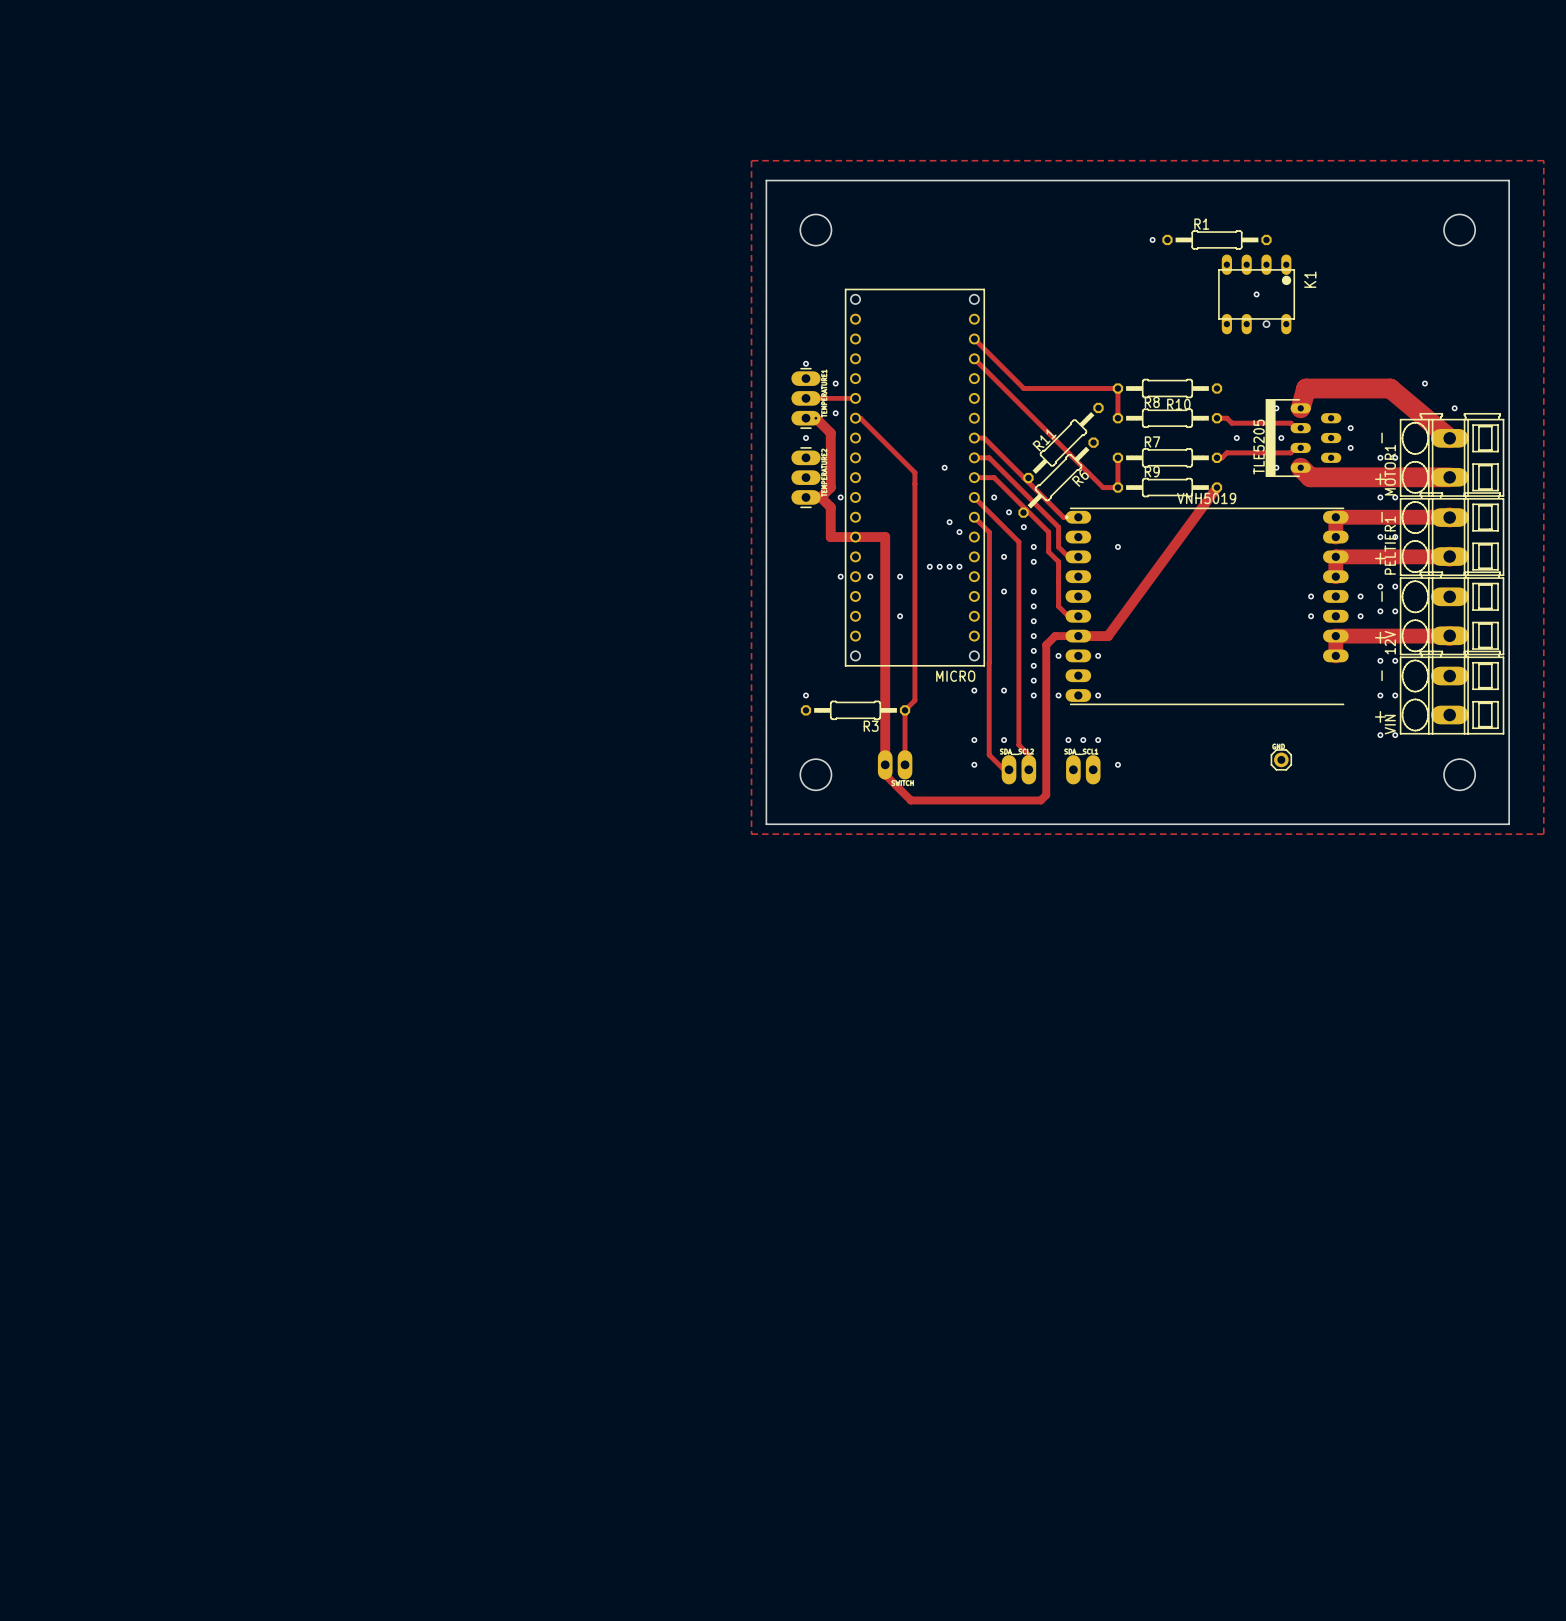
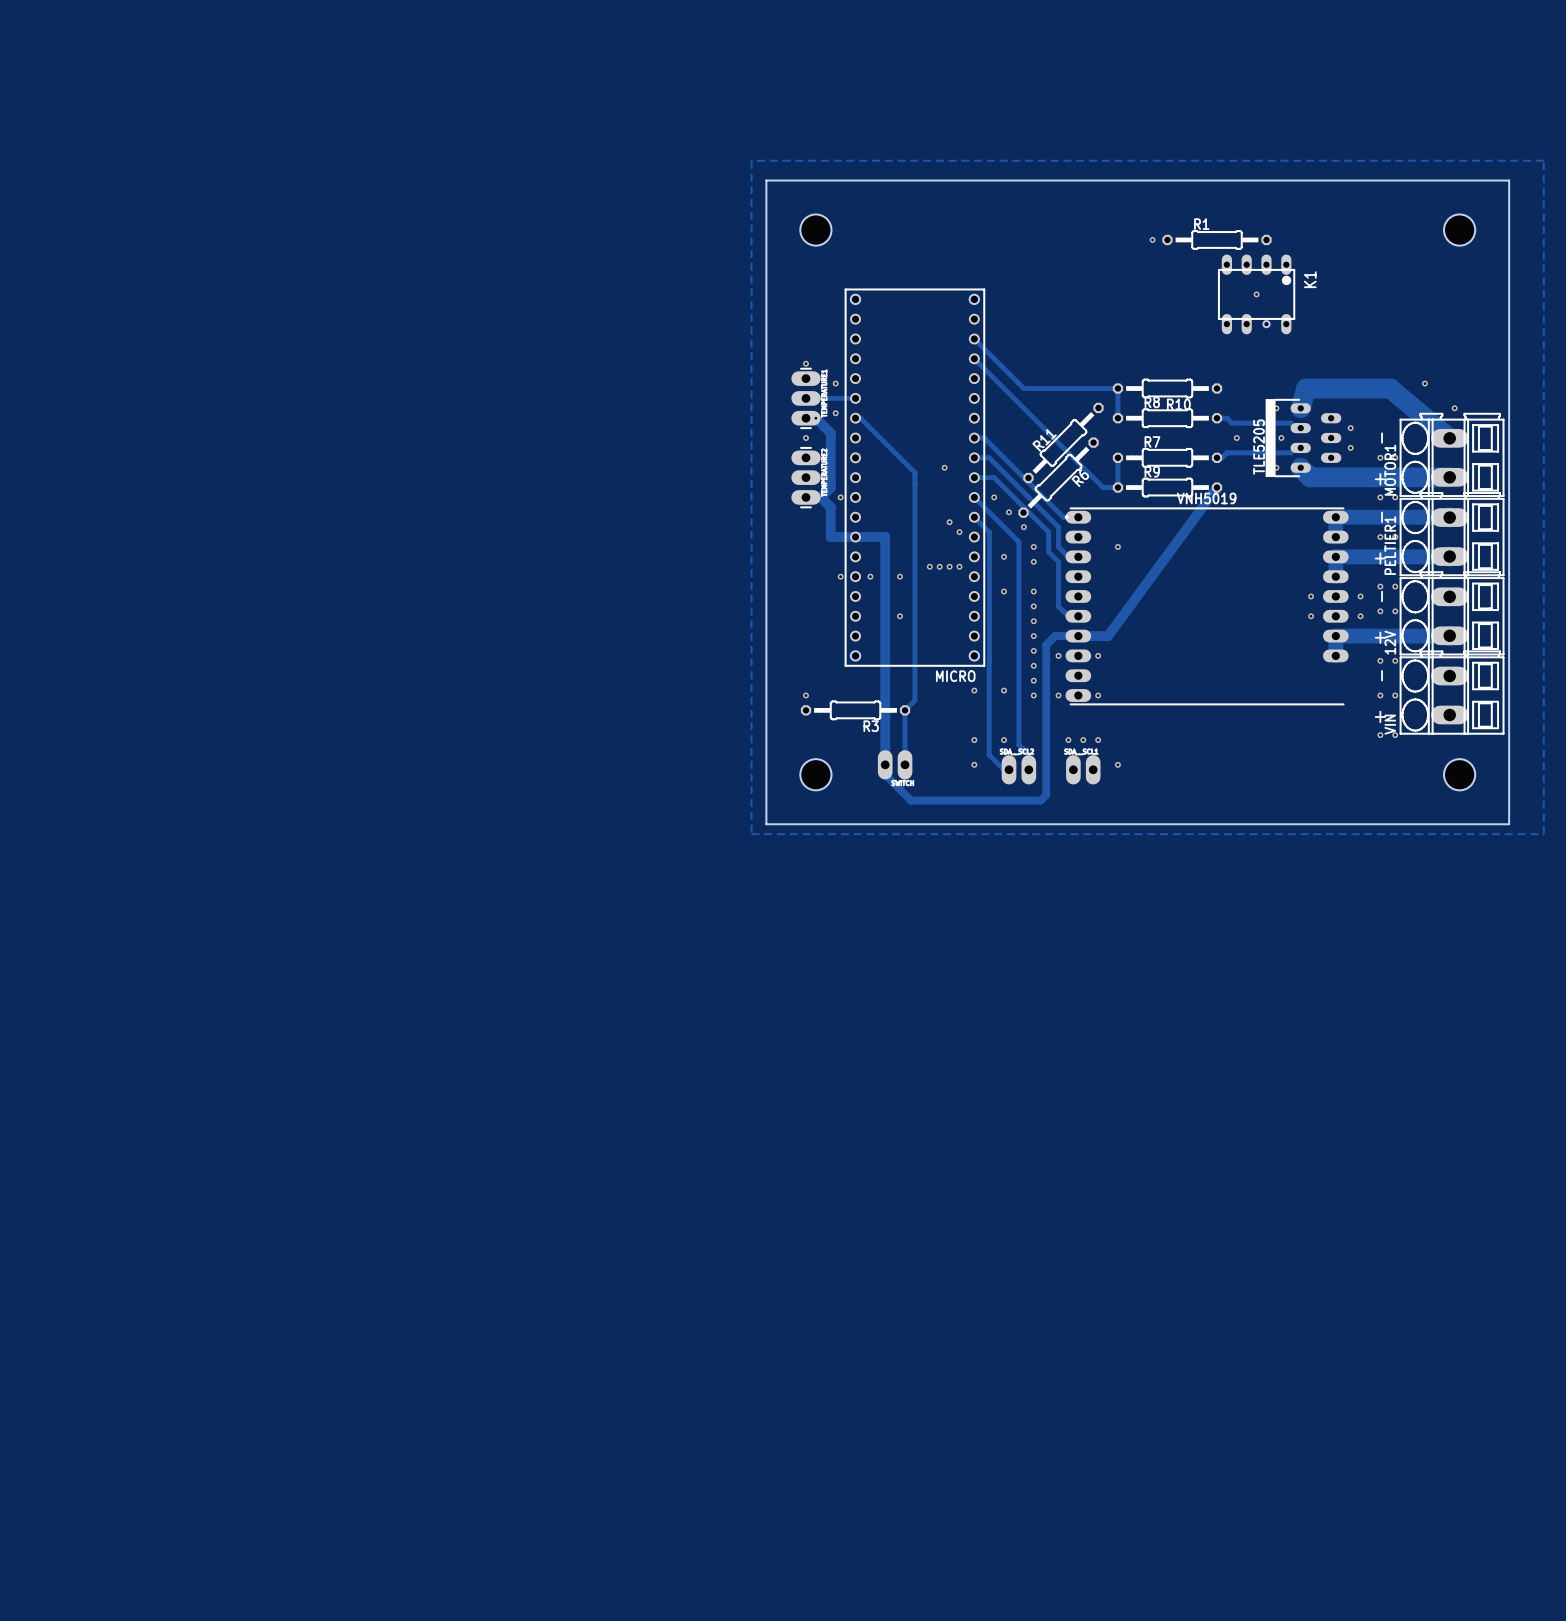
part: (1281, 759) -> none

